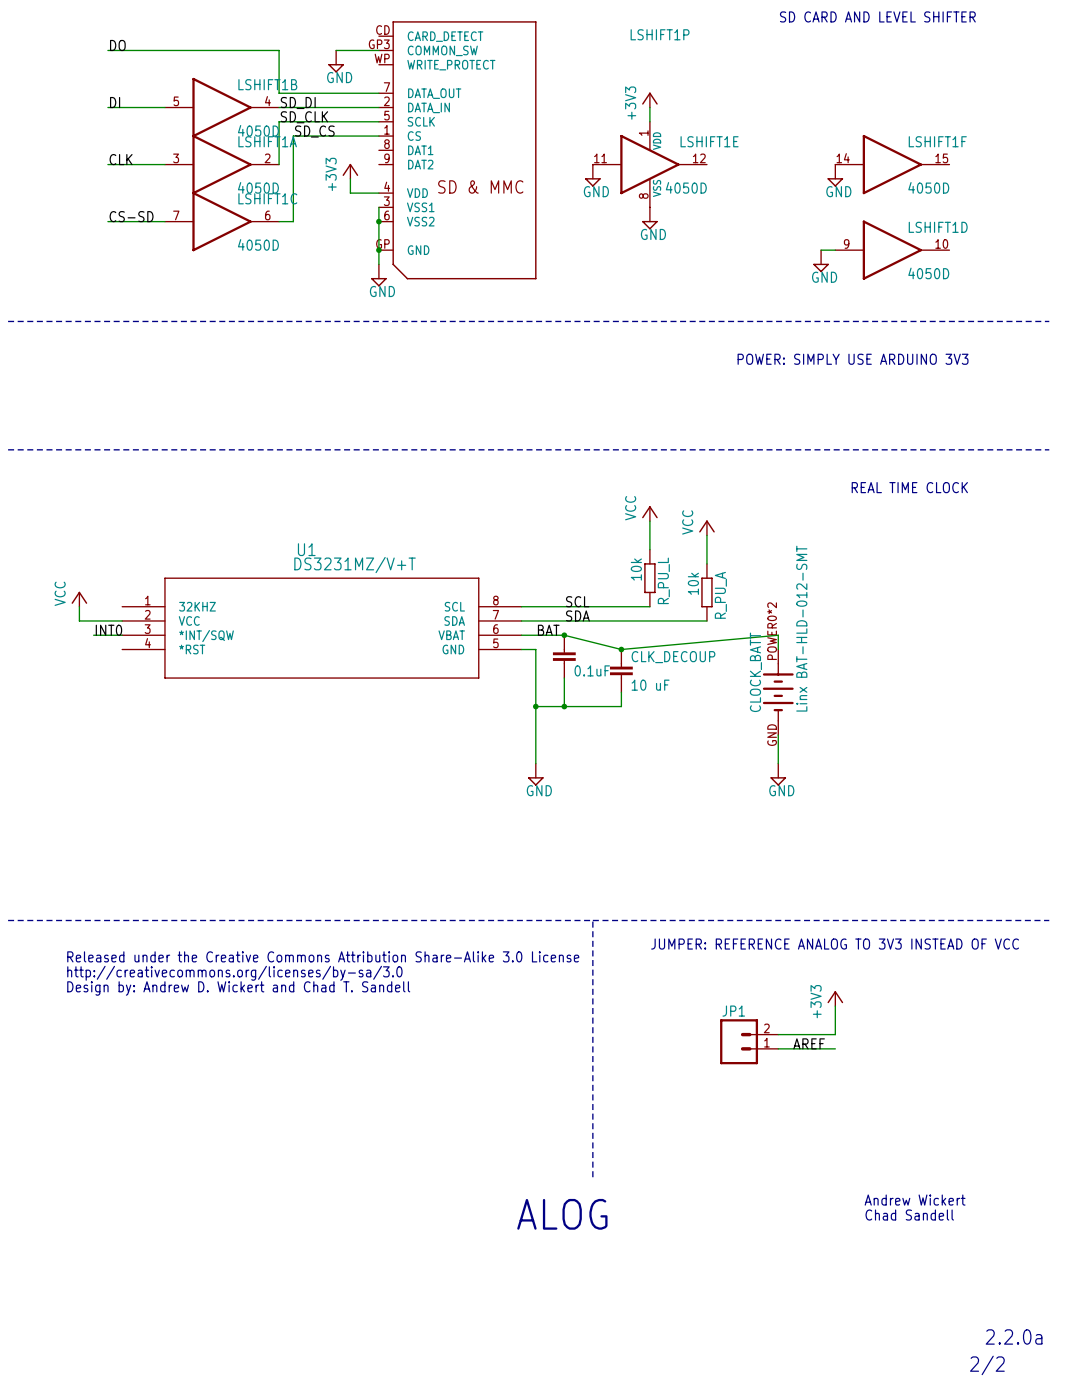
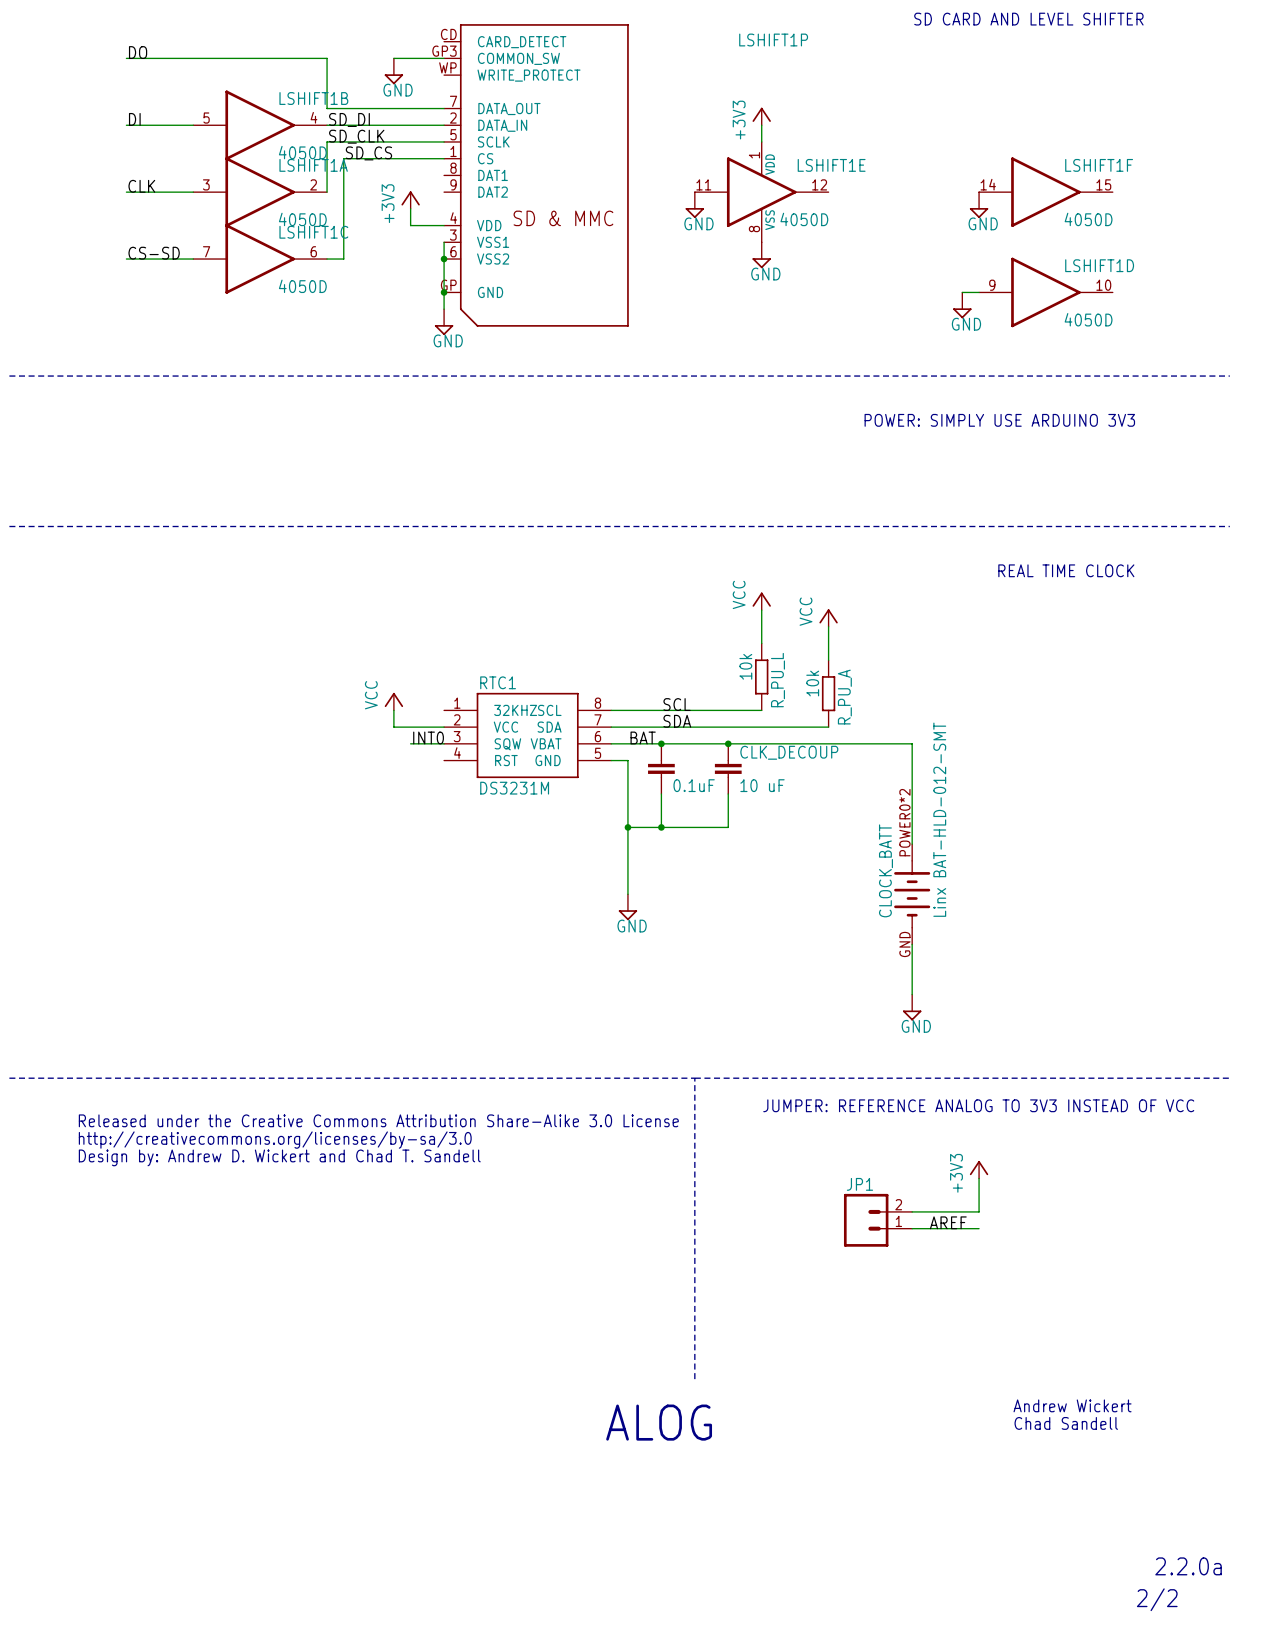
power symbol: VCC (79, 599) -> none
power symbol: none -> VCC (393, 701)
wire: (79, 606) (79, 620) (122, 620) -> none
wire: none -> (393, 710) (393, 727) (444, 727)
U1: DS3231MZ/V+T (321, 628) -> none
RTC1: none -> DS3231M (527, 735)
label: INT0 (108, 630) -> none
label: none -> INT0 (428, 737)
wire: (93, 635) (122, 635) -> none
wire: none -> (410, 743) (444, 743)
wire: (564, 635) (621, 649) (778, 635) -> (661, 743) (912, 743)
junction position: (621, 649) -> (728, 743)
CLK_DECOUP position: (621, 670) -> (728, 768)
CLOCK_BATT position: (778, 692) -> (912, 894)
power symbol position: GND (778, 774) -> GND (912, 1007)
wire: none -> (912, 944) (912, 994)

